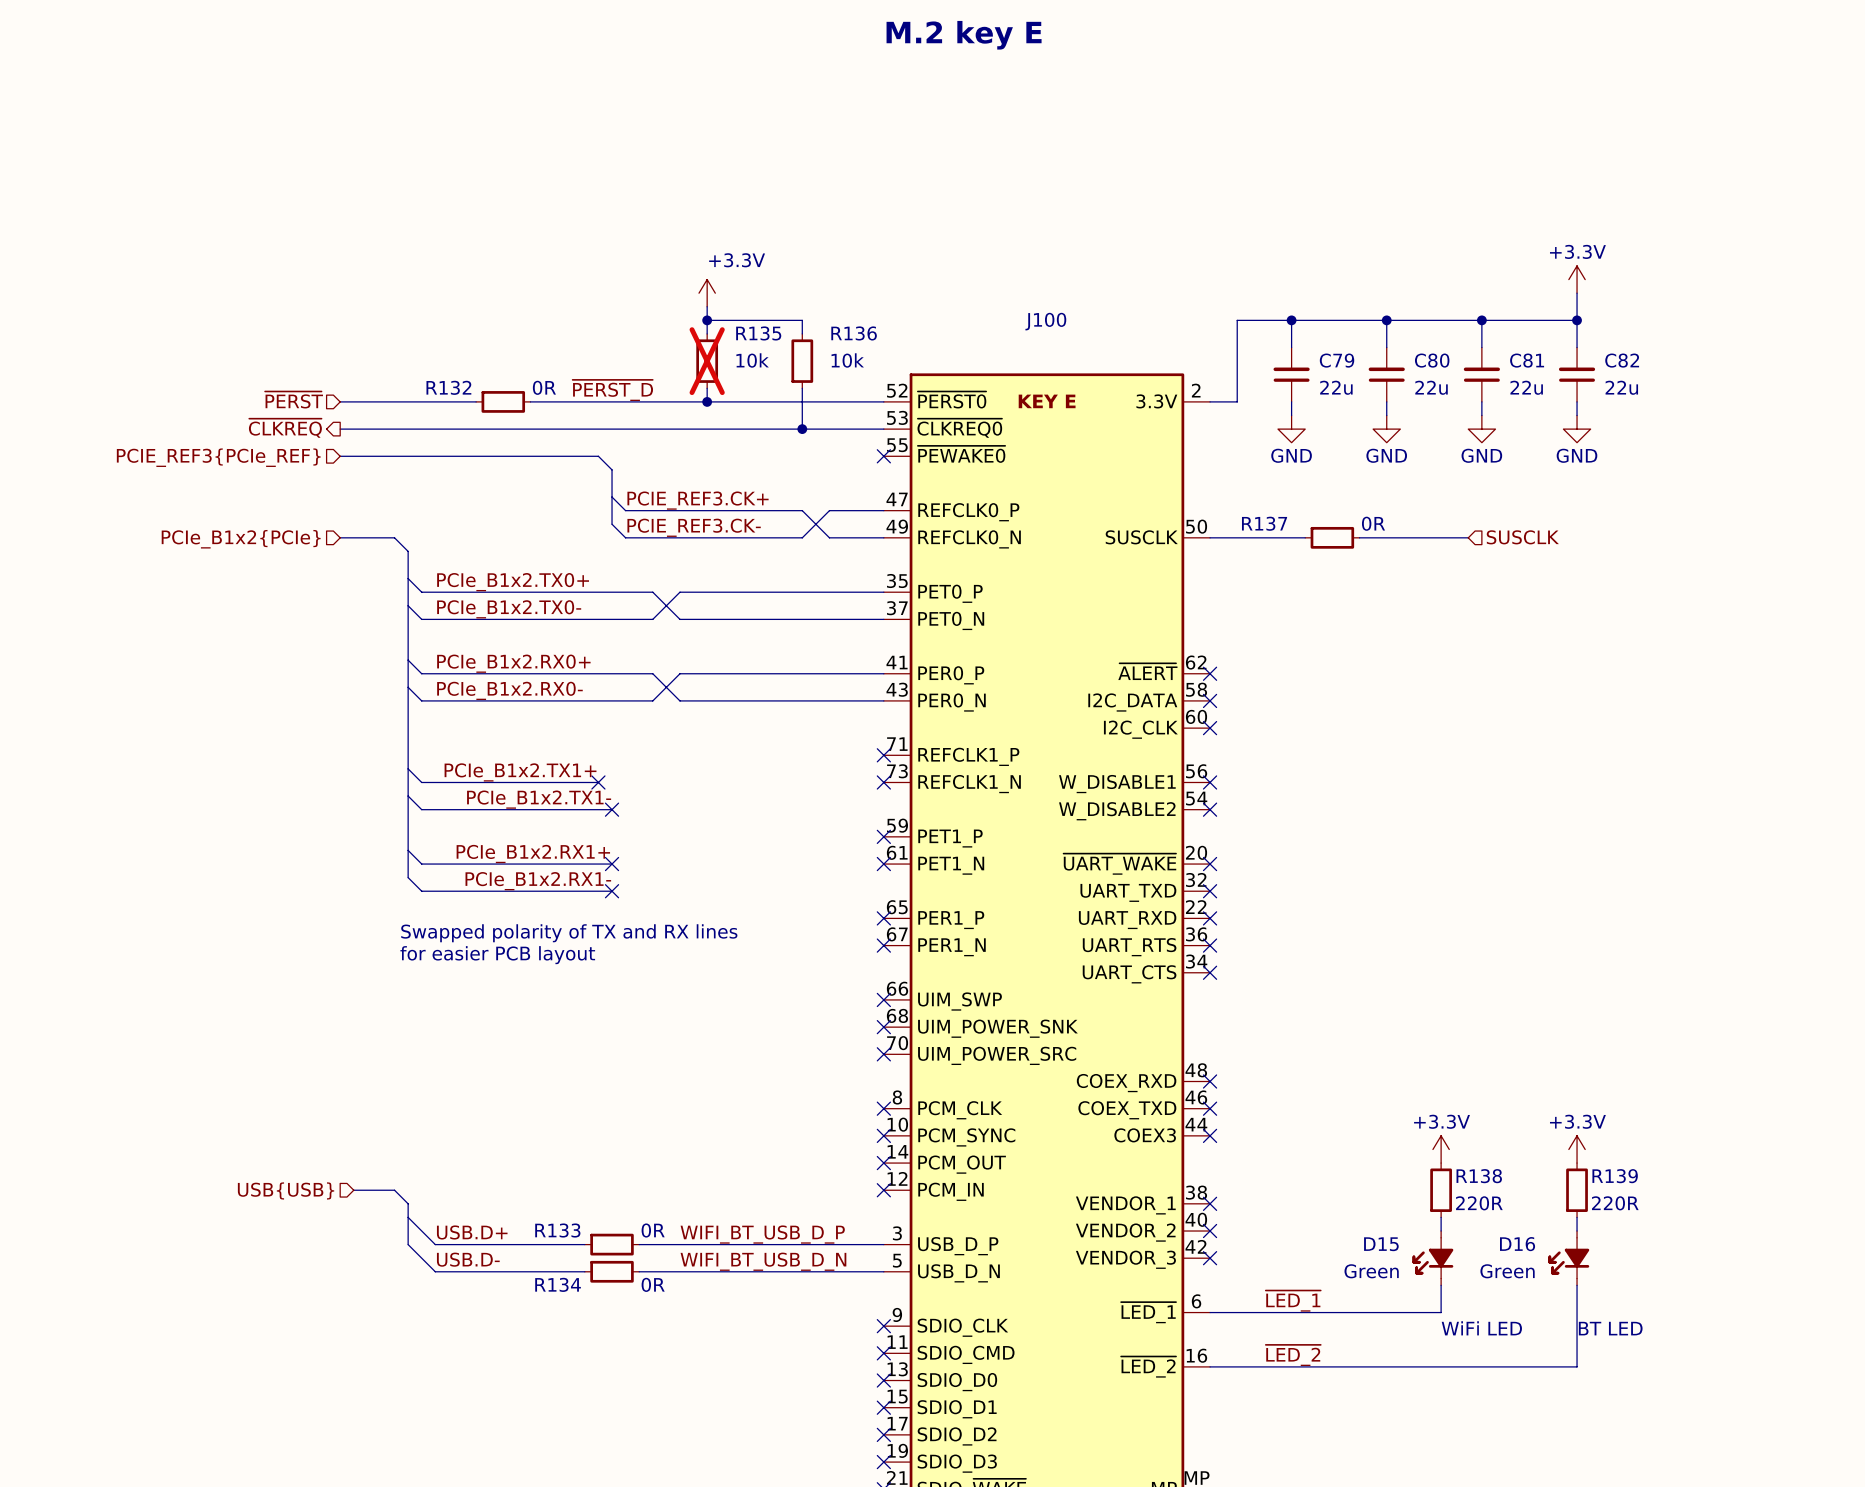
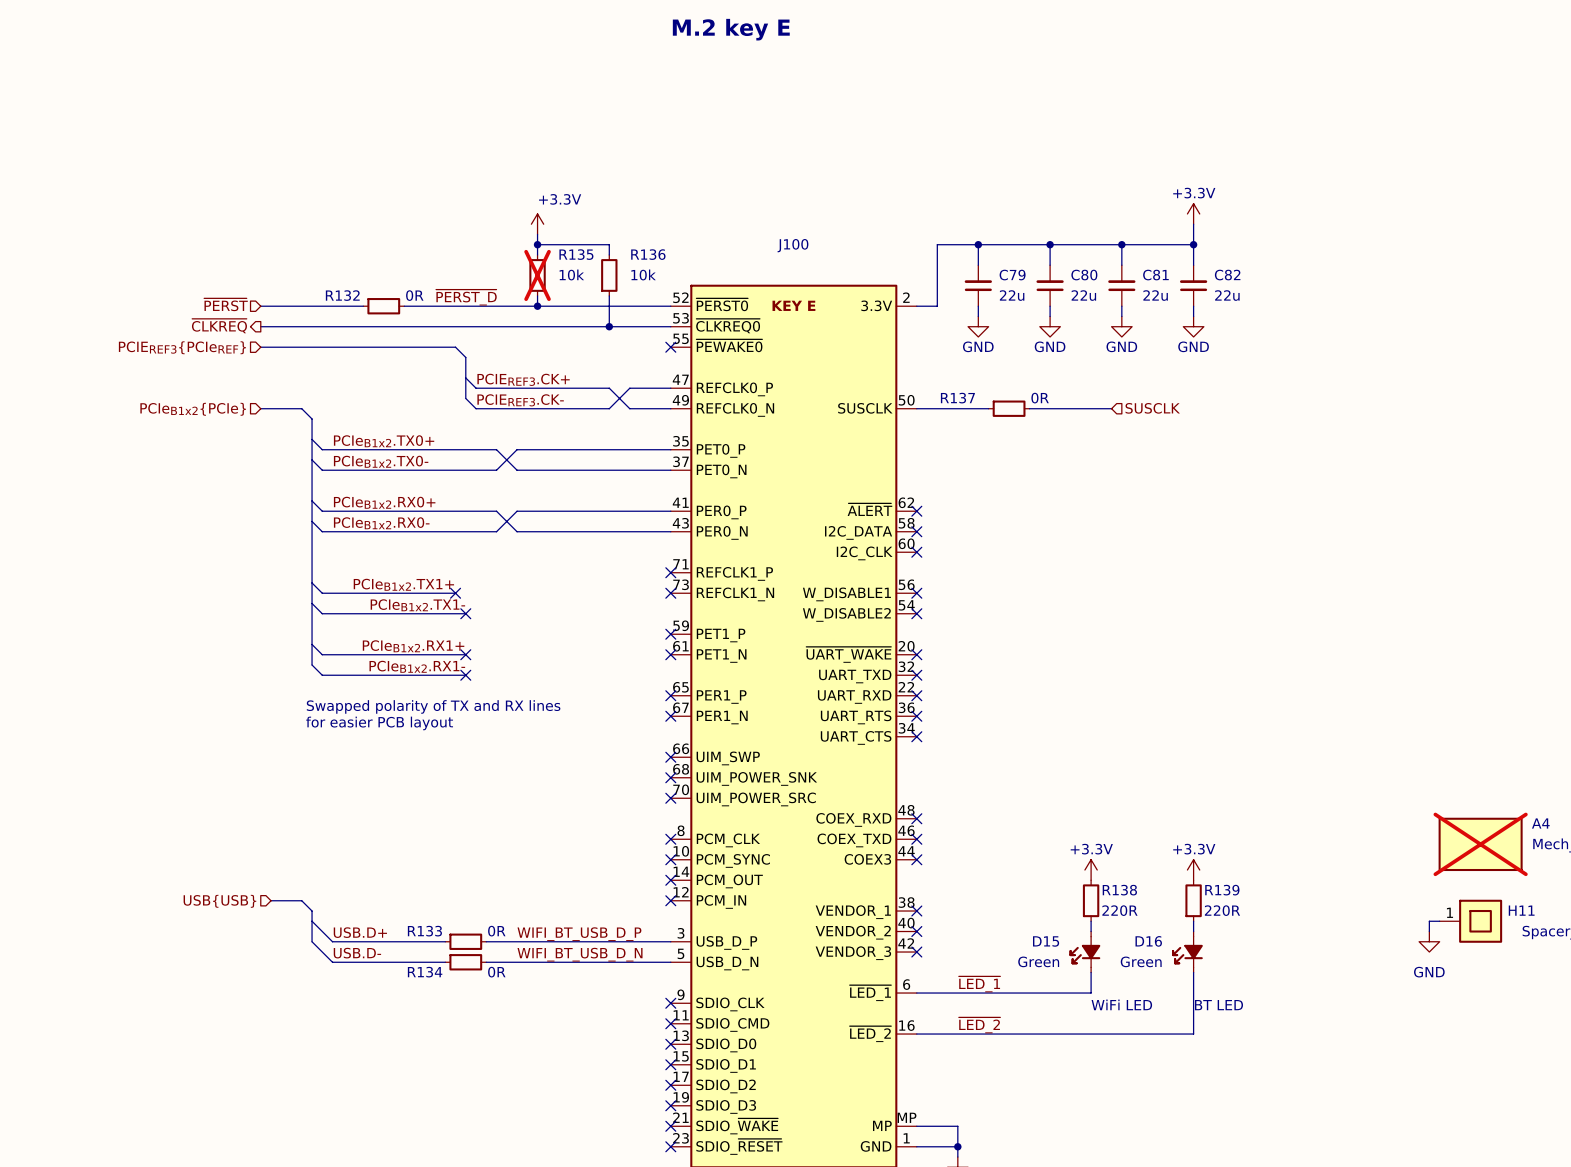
hierarchical label: PCIE_REF3{PCIe_REF} (218, 457) -> PCIEREF3{PCIeREF} (182, 347)
label: PCIE_REF3.CK+ (698, 500) -> PCIEREF3.CK+ (523, 379)
label: PCIE_REF3.CK- (694, 527) -> PCIEREF3.CK- (520, 400)
hierarchical label: PCIe_B1x2{PCIe} (241, 539) -> PCIeB1x2{PCIe} (193, 409)
label: PCIe_B1x2.TX0+ (513, 582) -> PCIeB1x2.TX0+ (384, 441)
label: PCIe_B1x2.TX0- (509, 609) -> PCIeB1x2.TX0- (381, 461)
label: PCIe_B1x2.RX0+ (513, 663) -> PCIeB1x2.RX0+ (384, 502)
label: PCIe_B1x2.RX0- (509, 690) -> PCIeB1x2.RX0- (381, 523)
label: PCIe_B1x2.TX1+ (520, 772) -> PCIeB1x2.TX1+ (403, 584)
label: PCIe_B1x2.TX1- (539, 799) -> PCIeB1x2.TX1- (417, 605)
label: PCIe_B1x2.RX1+ (533, 853) -> PCIeB1x2.RX1+ (413, 646)
label: PCIe_B1x2.RX1- (538, 881) -> PCIeB1x2.RX1- (417, 666)

